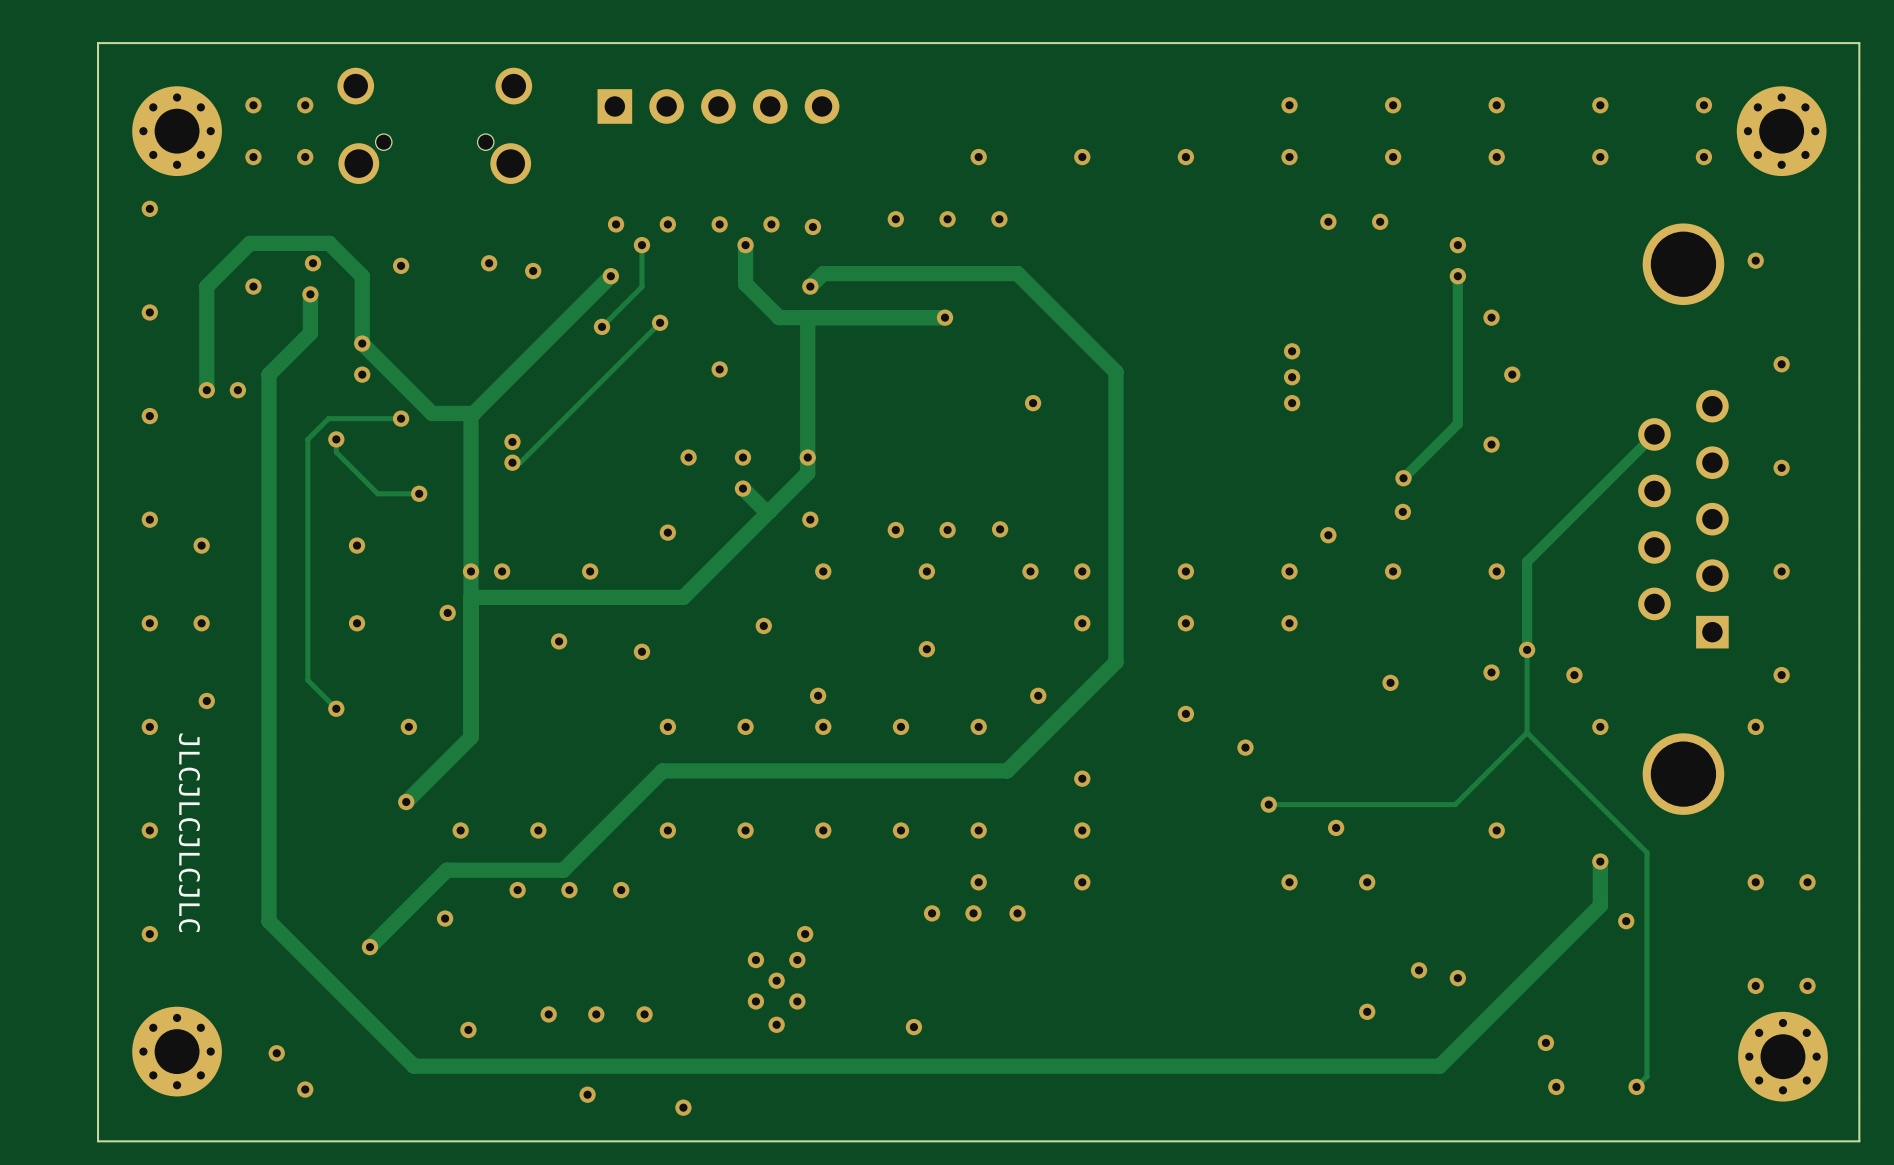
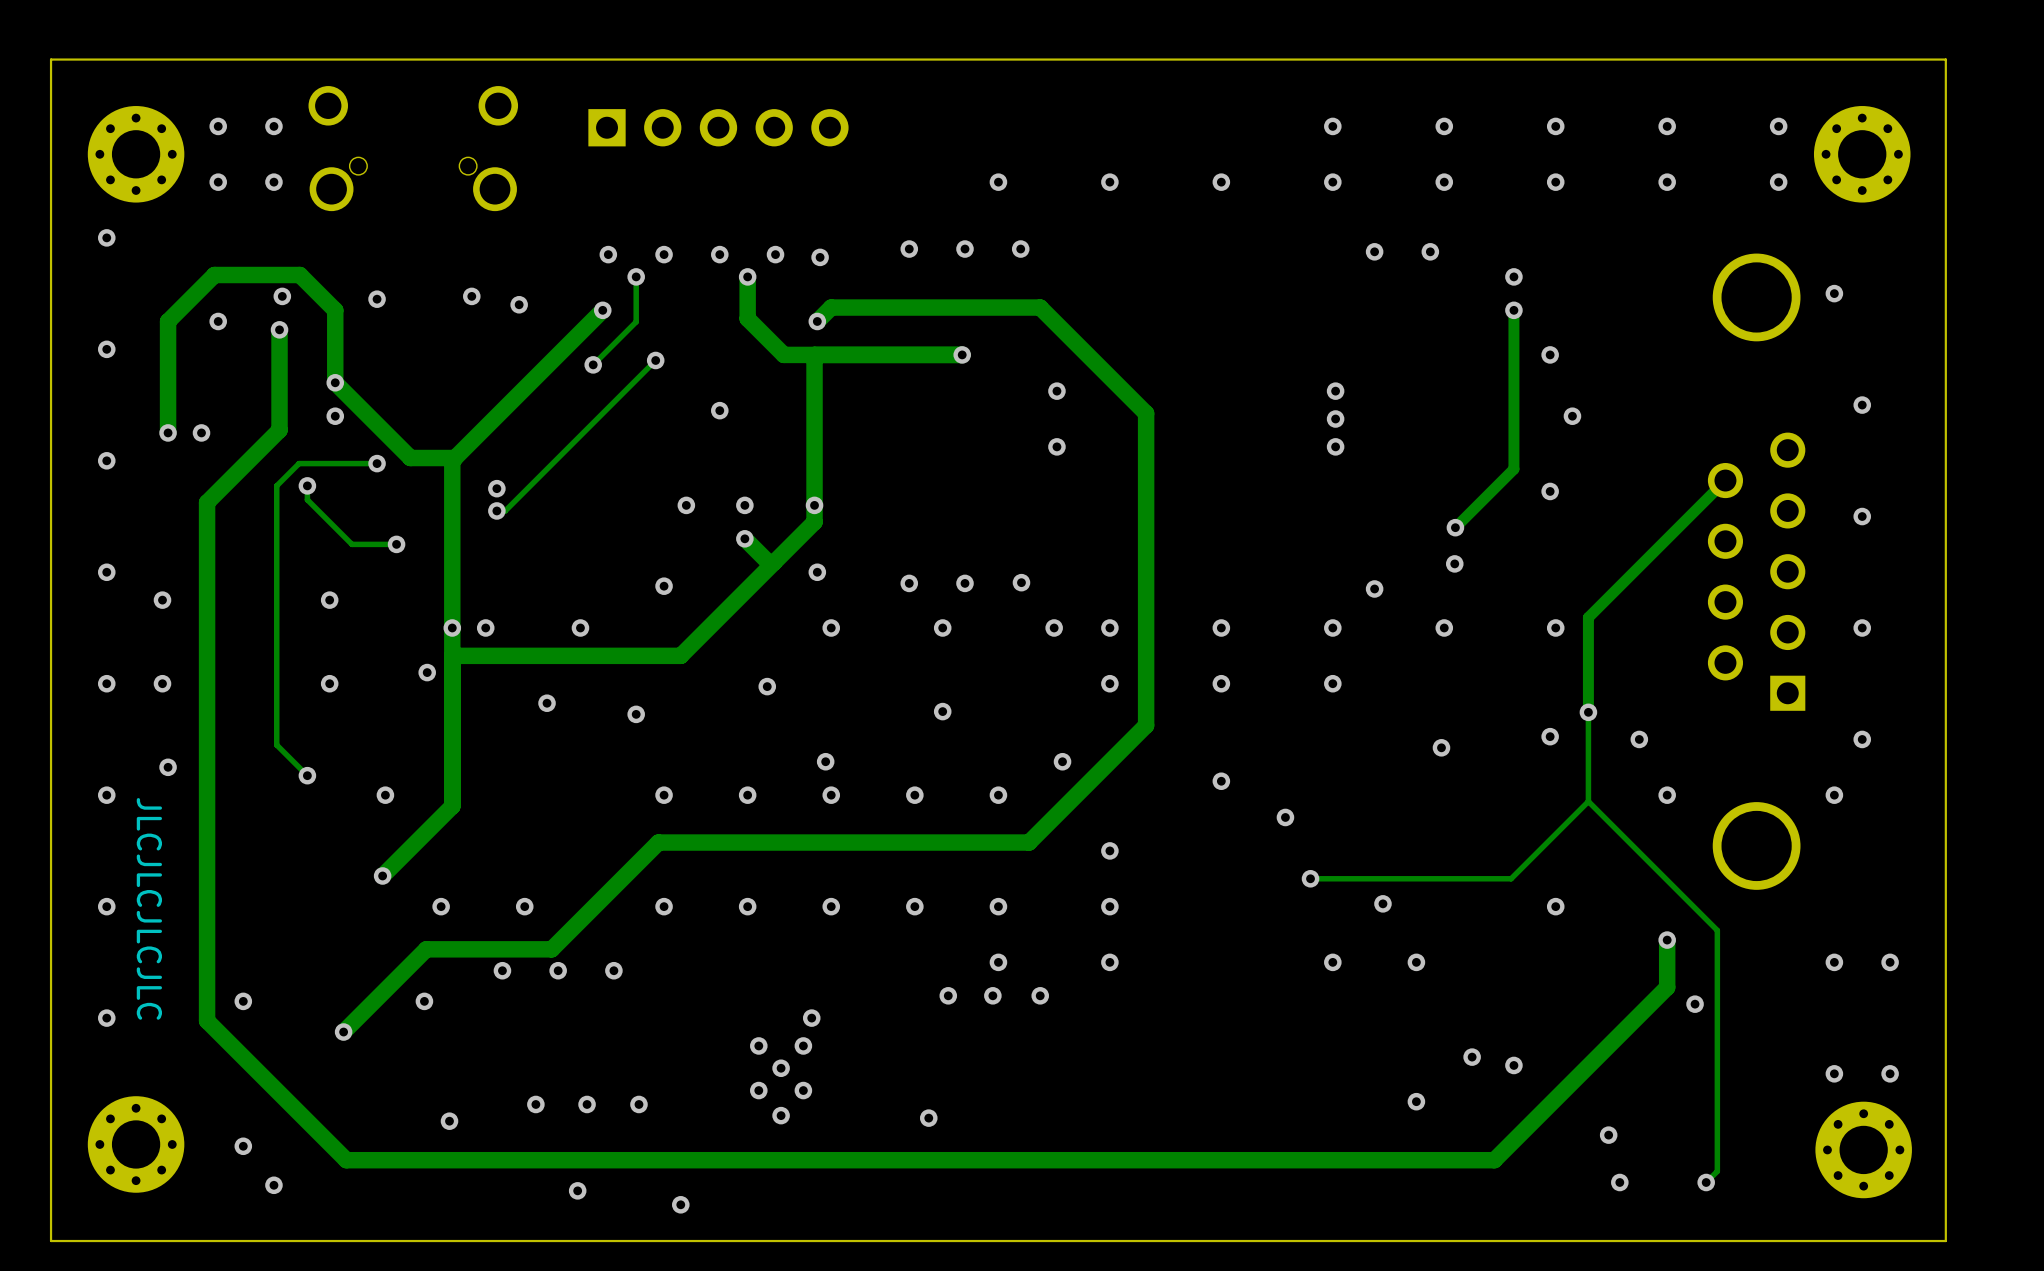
track: (310, 333) (268, 374) (268, 921) (414, 1066) -> (279, 371) (279, 430) (207, 502) (207, 1020) (346, 1160) (390, 1160)
via: none -> (1056, 391)
via: none -> (243, 1001)

